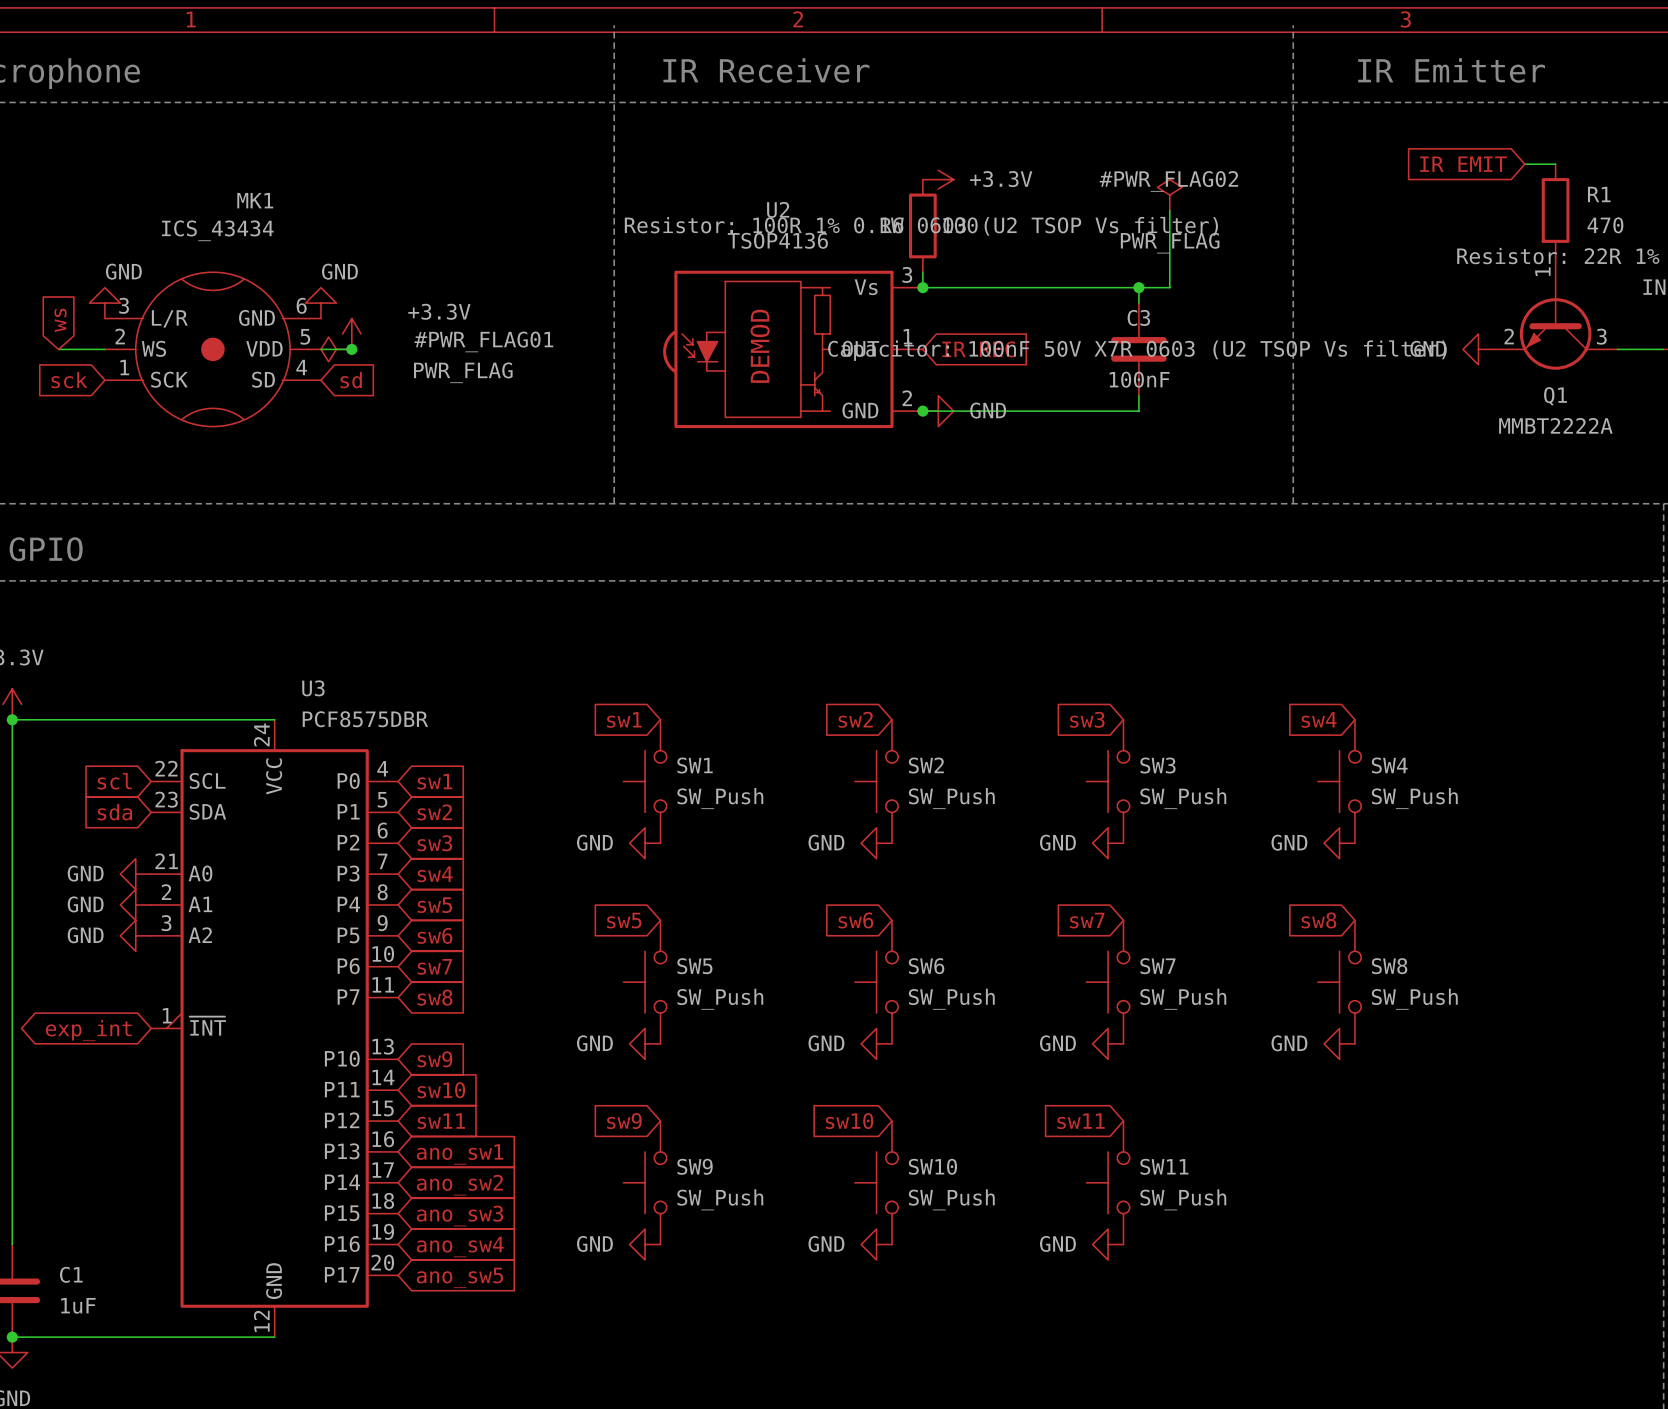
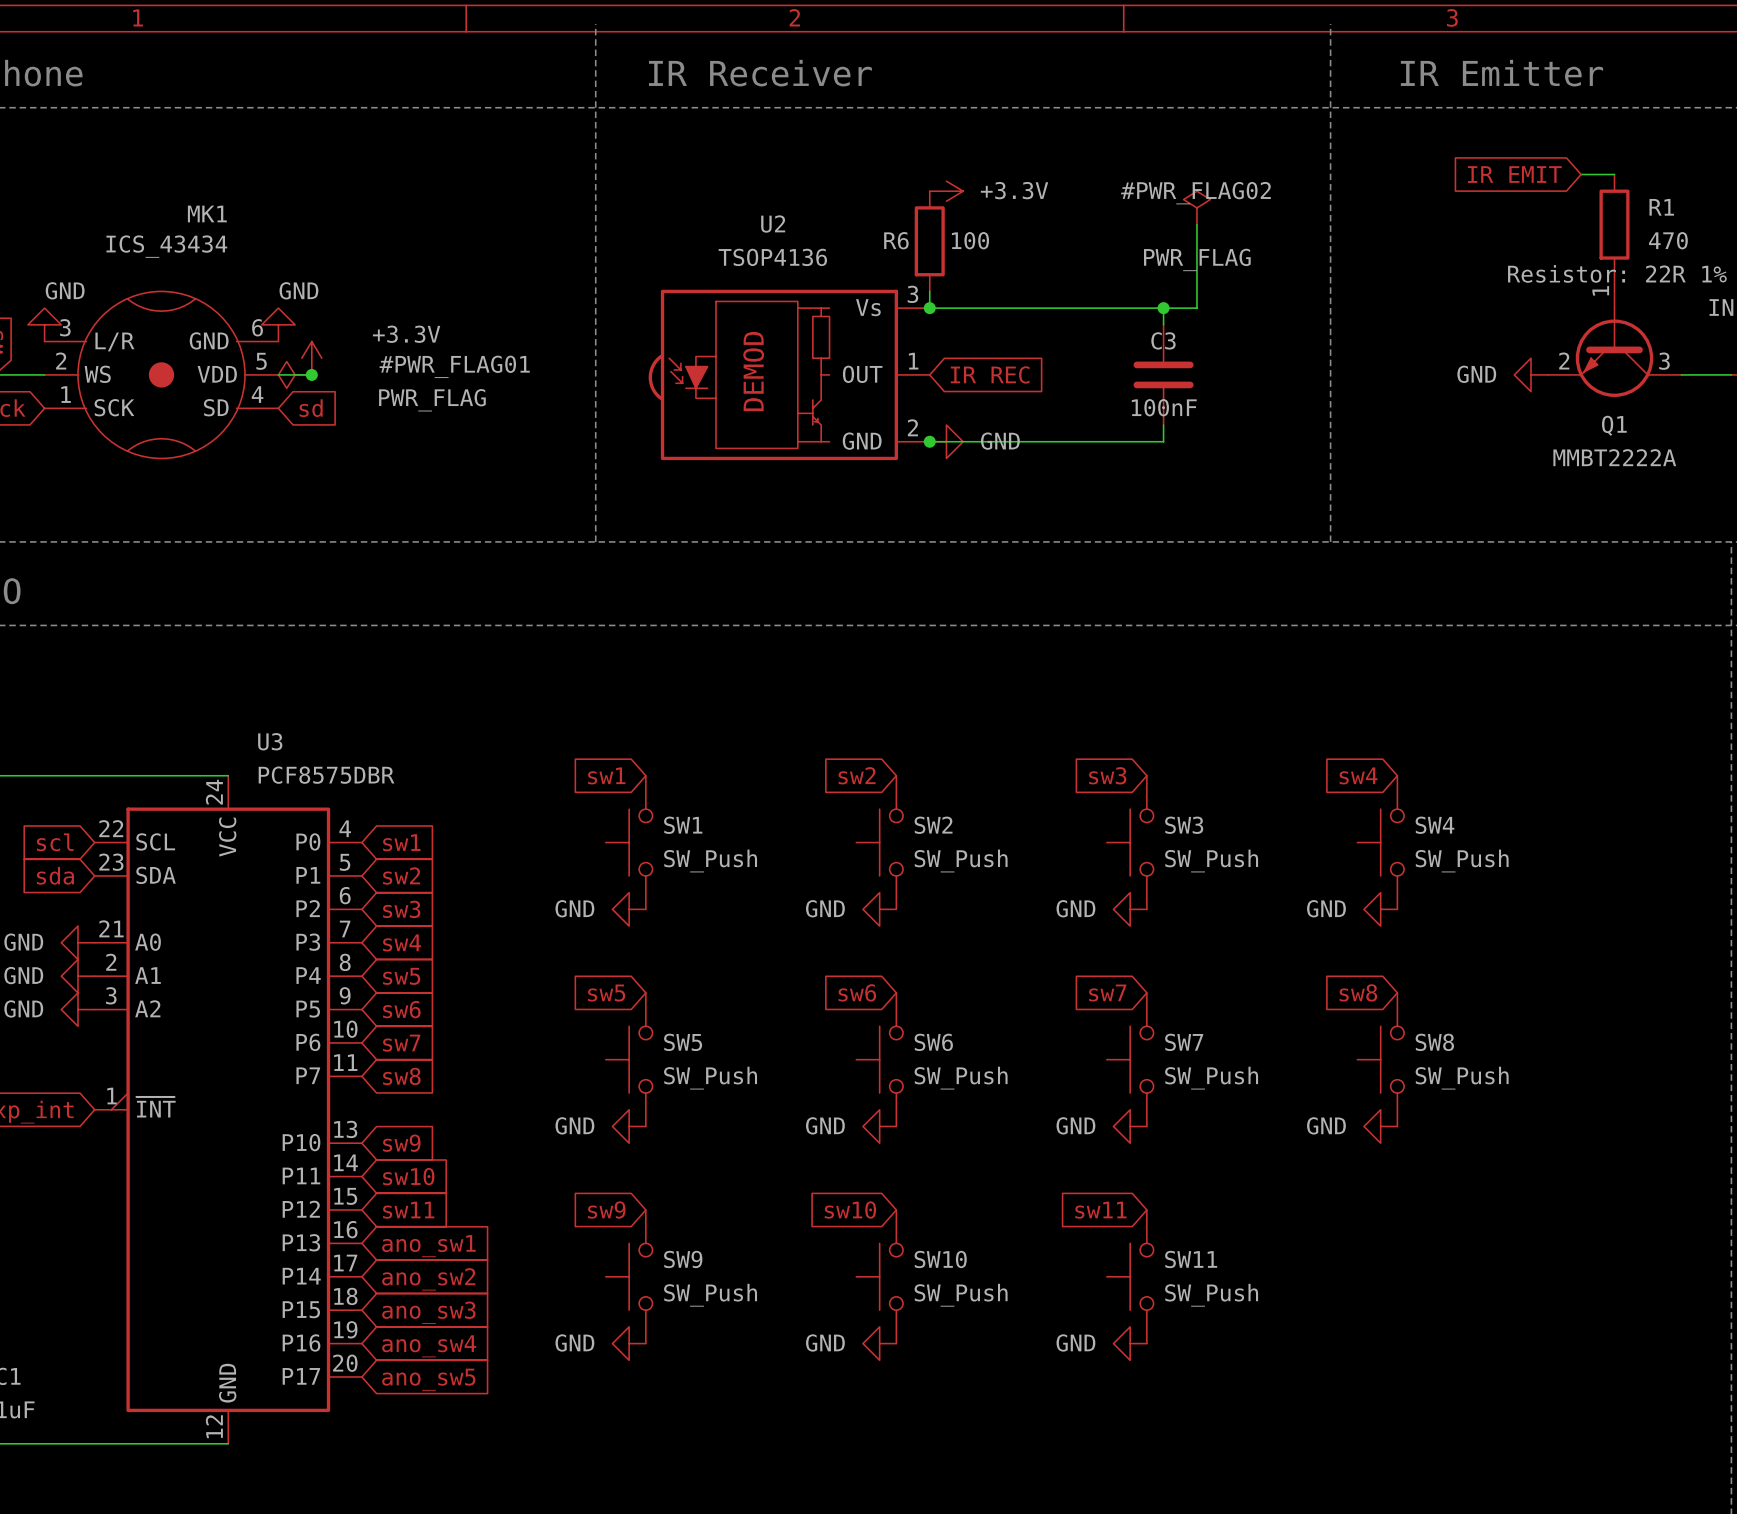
R6 text: Resistor: 100R 1% 0.1W 0603 (U2 TSOP Vs filter) (921, 226) -> none
C3 text: Capacitor: 100nF 50V X7R 0603 (U2 TSOP Vs filter) (1137, 350) -> none

